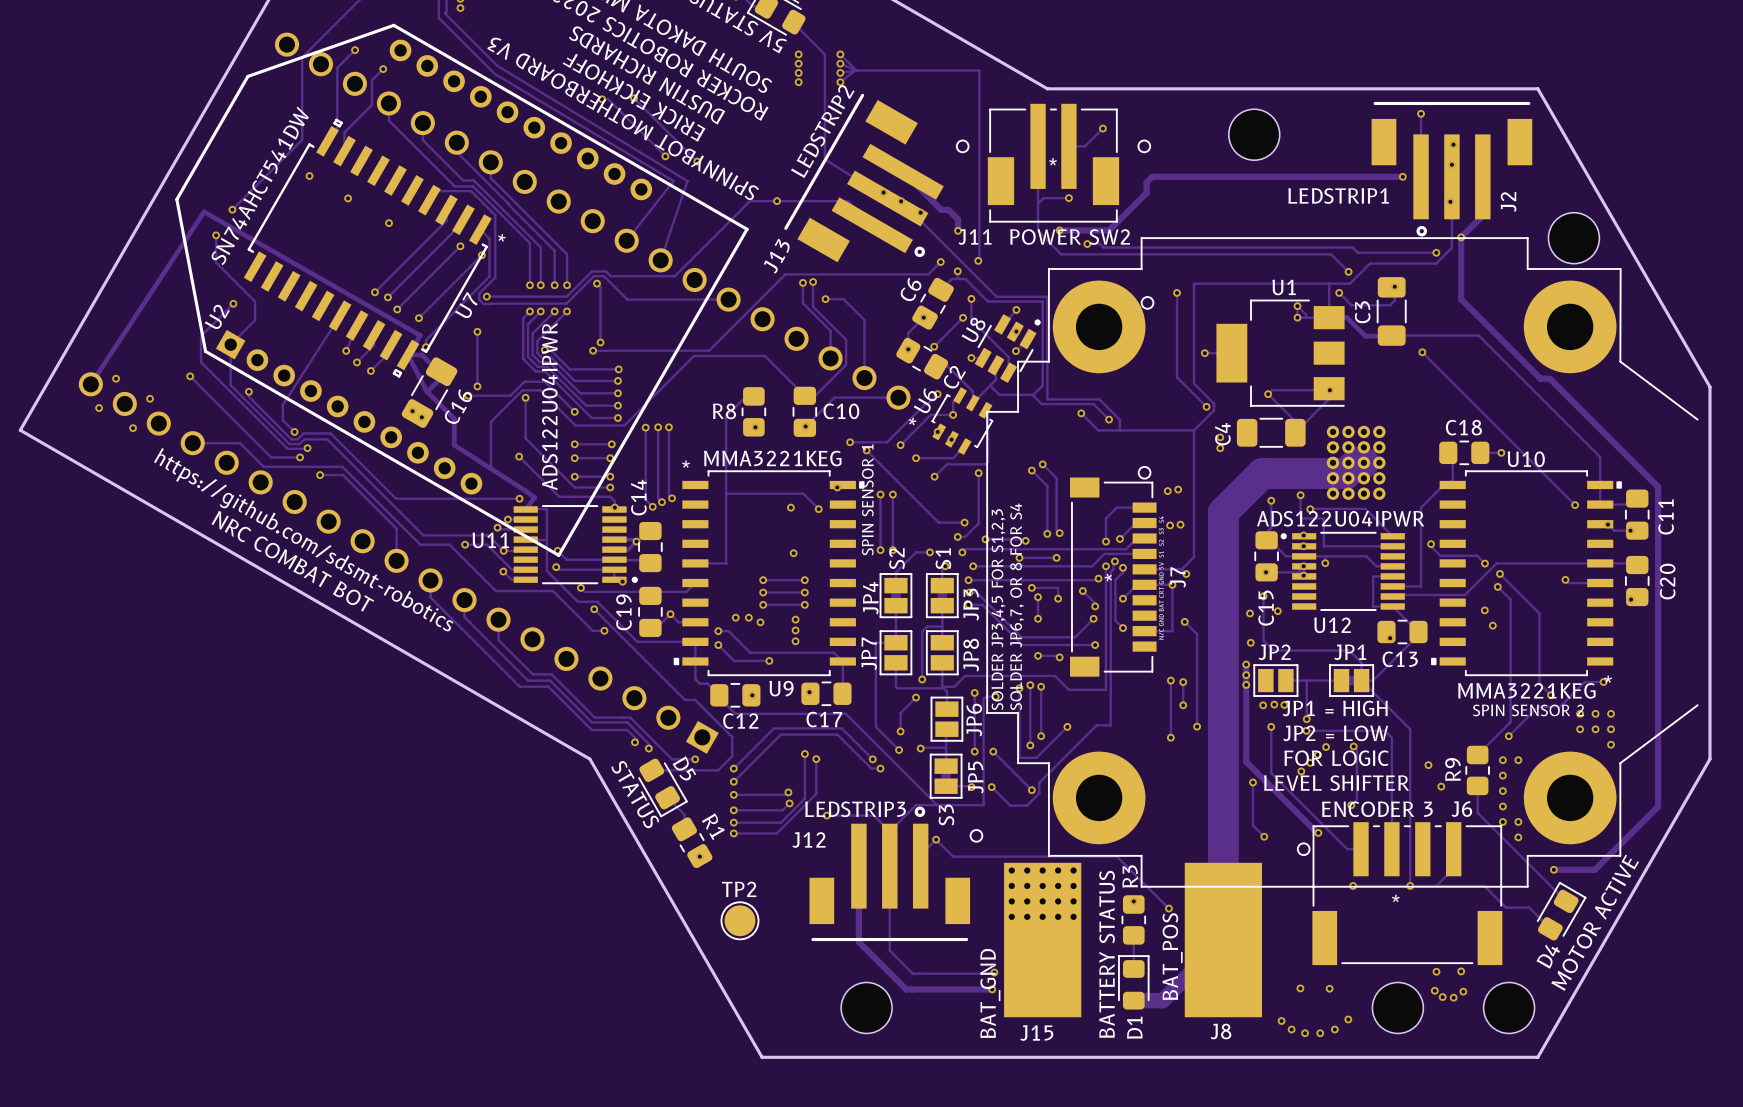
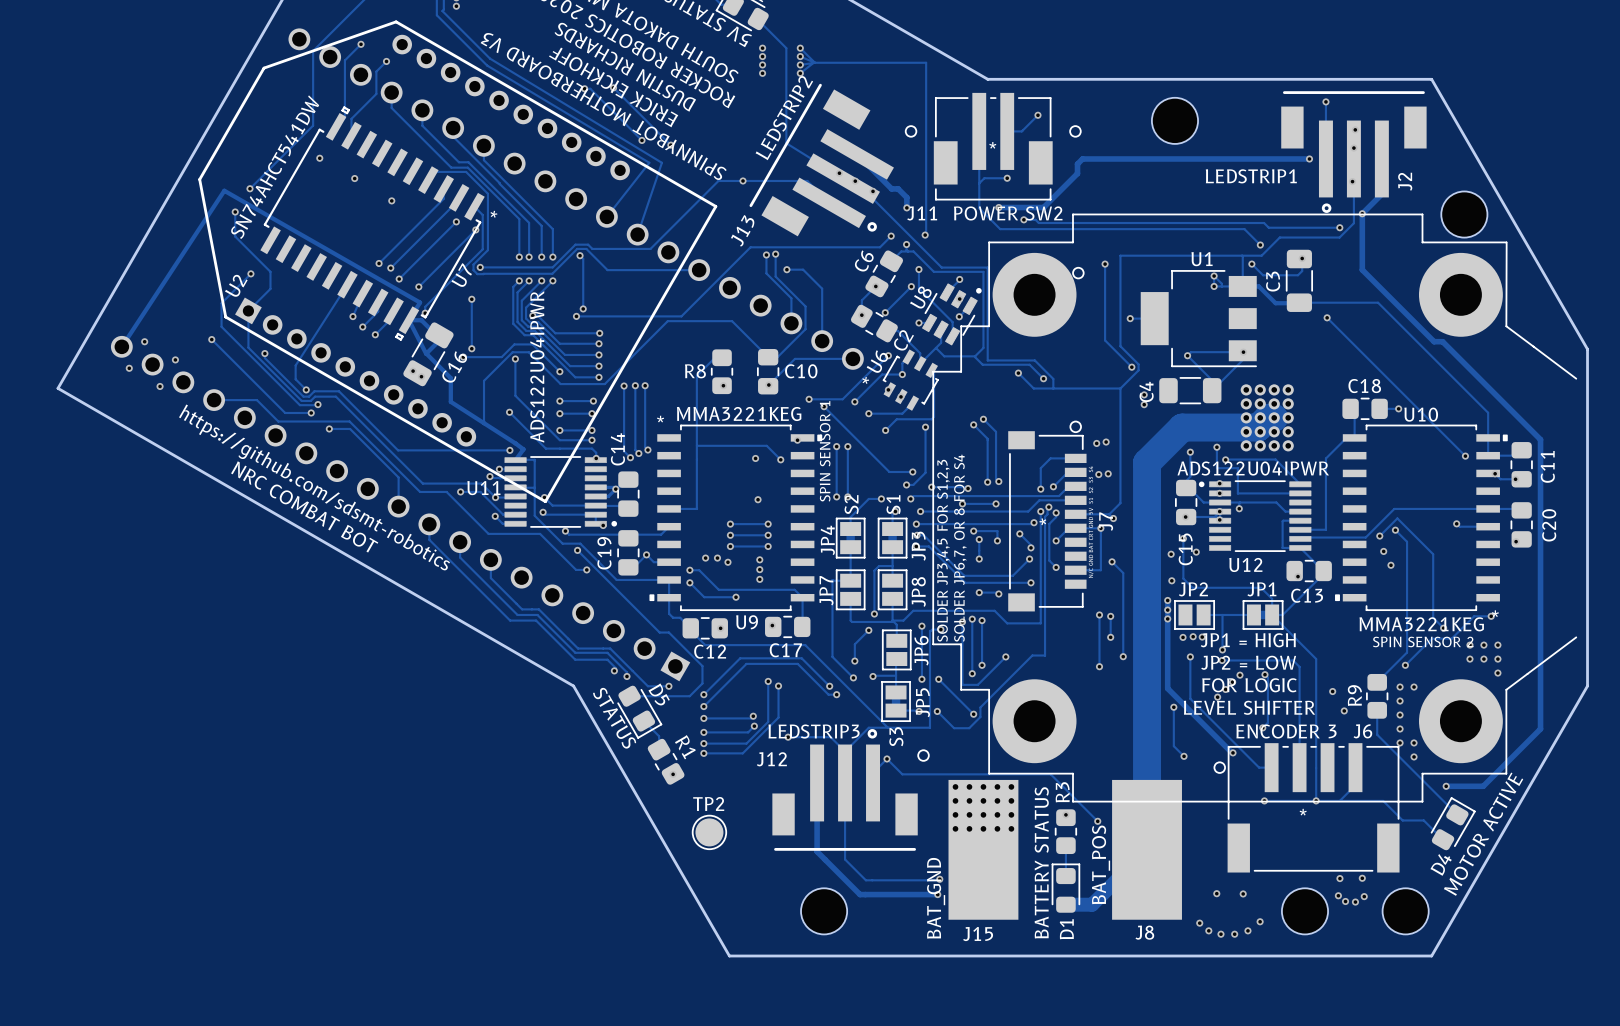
track: (1431, 544) (1440, 555) (1477, 555) (1484, 563) -> none
via: (1431, 544) -> none
via: (1484, 563) -> none
track: none -> (1397, 518) (1379, 536)
via: (1499, 573) -> none
via: none -> (1379, 536)

